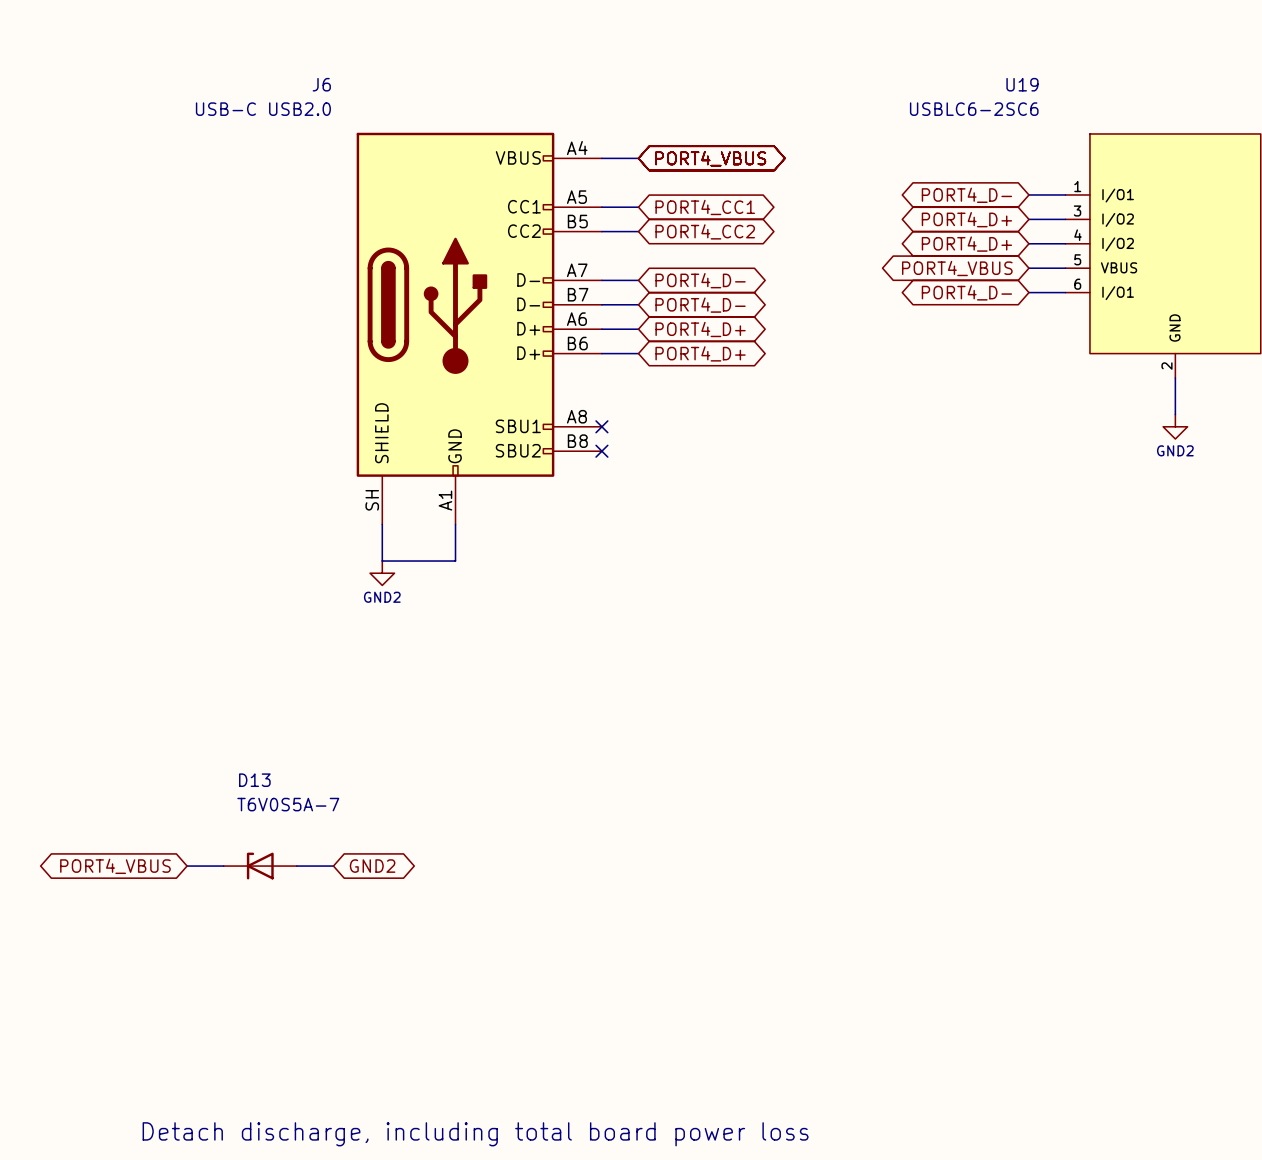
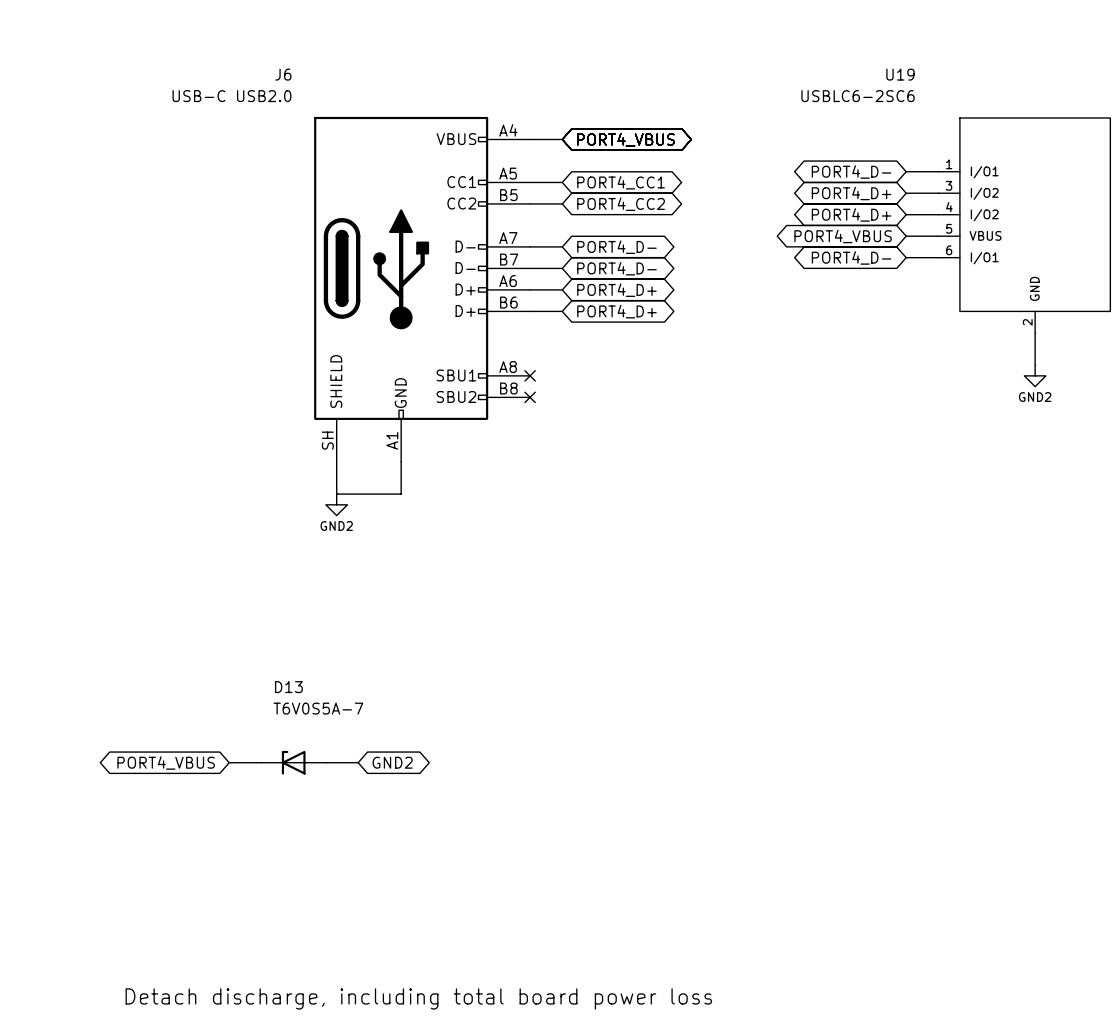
global label position: PORT4_VBUS (115, 866) -> PORT4_VBUS (166, 762)
wire: (187, 866) (223, 866) -> (325, 762) (358, 762)
D13 position: (260, 866) -> (293, 762)
global label position: GND2 (372, 866) -> GND2 (392, 762)

